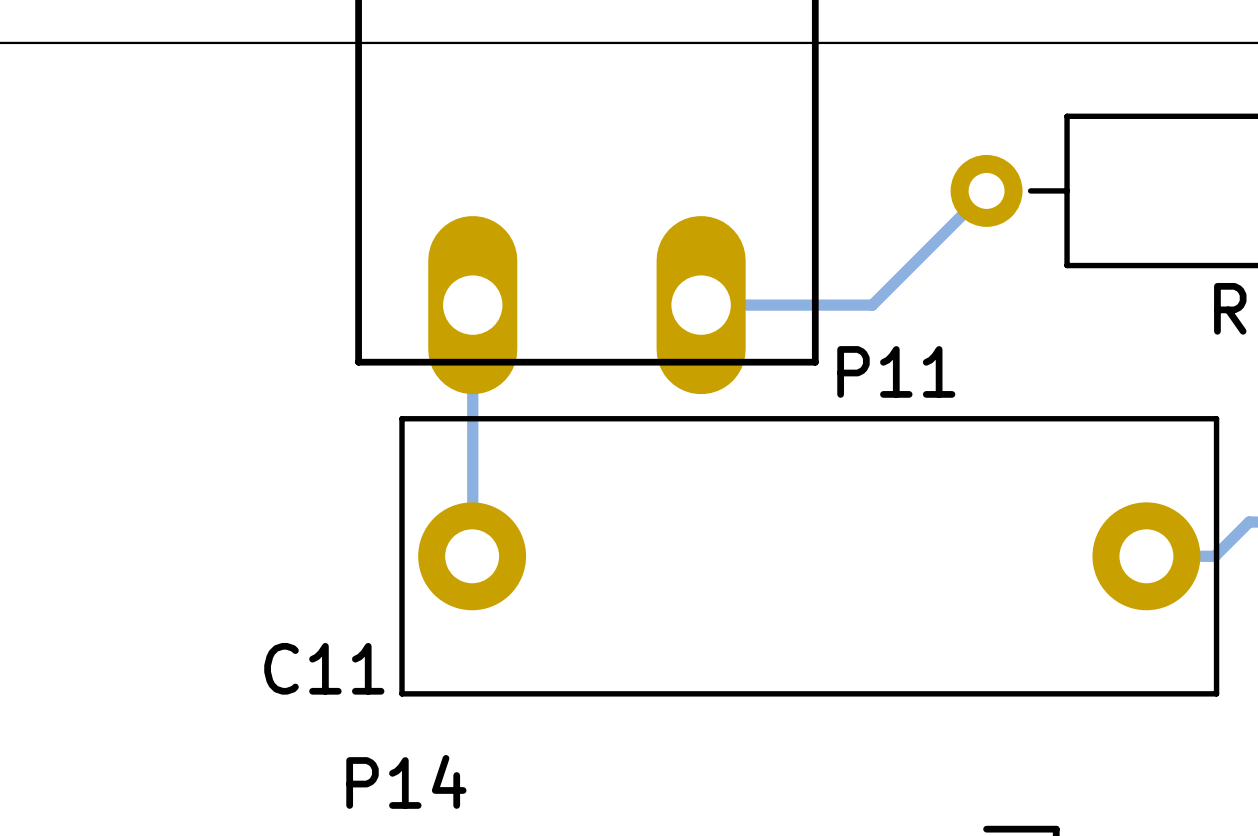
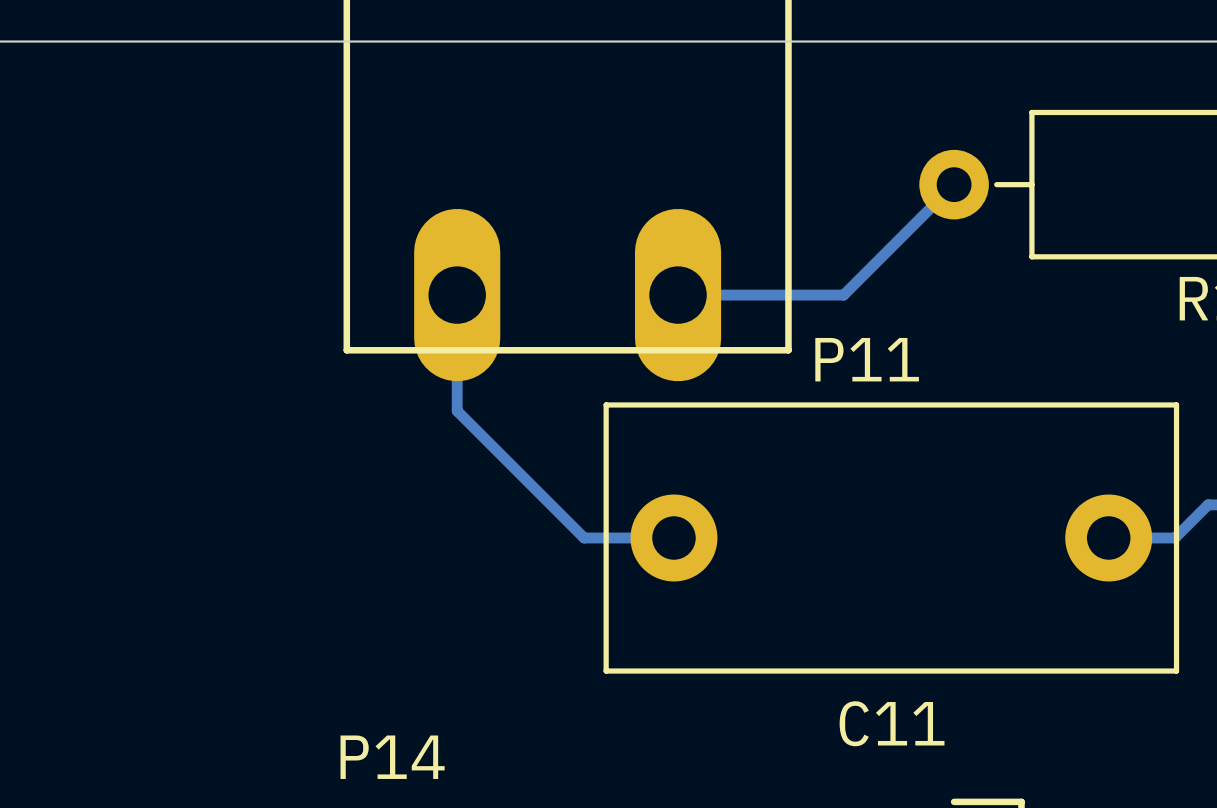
C11 footprint: [399, 416, 1220, 697] -> [603, 402, 1180, 674]
bottom track: (472, 424) (472, 555) -> (457, 411) (584, 538) (673, 538)
C11 name position: C11 (324, 668) -> C11 (892, 723)

